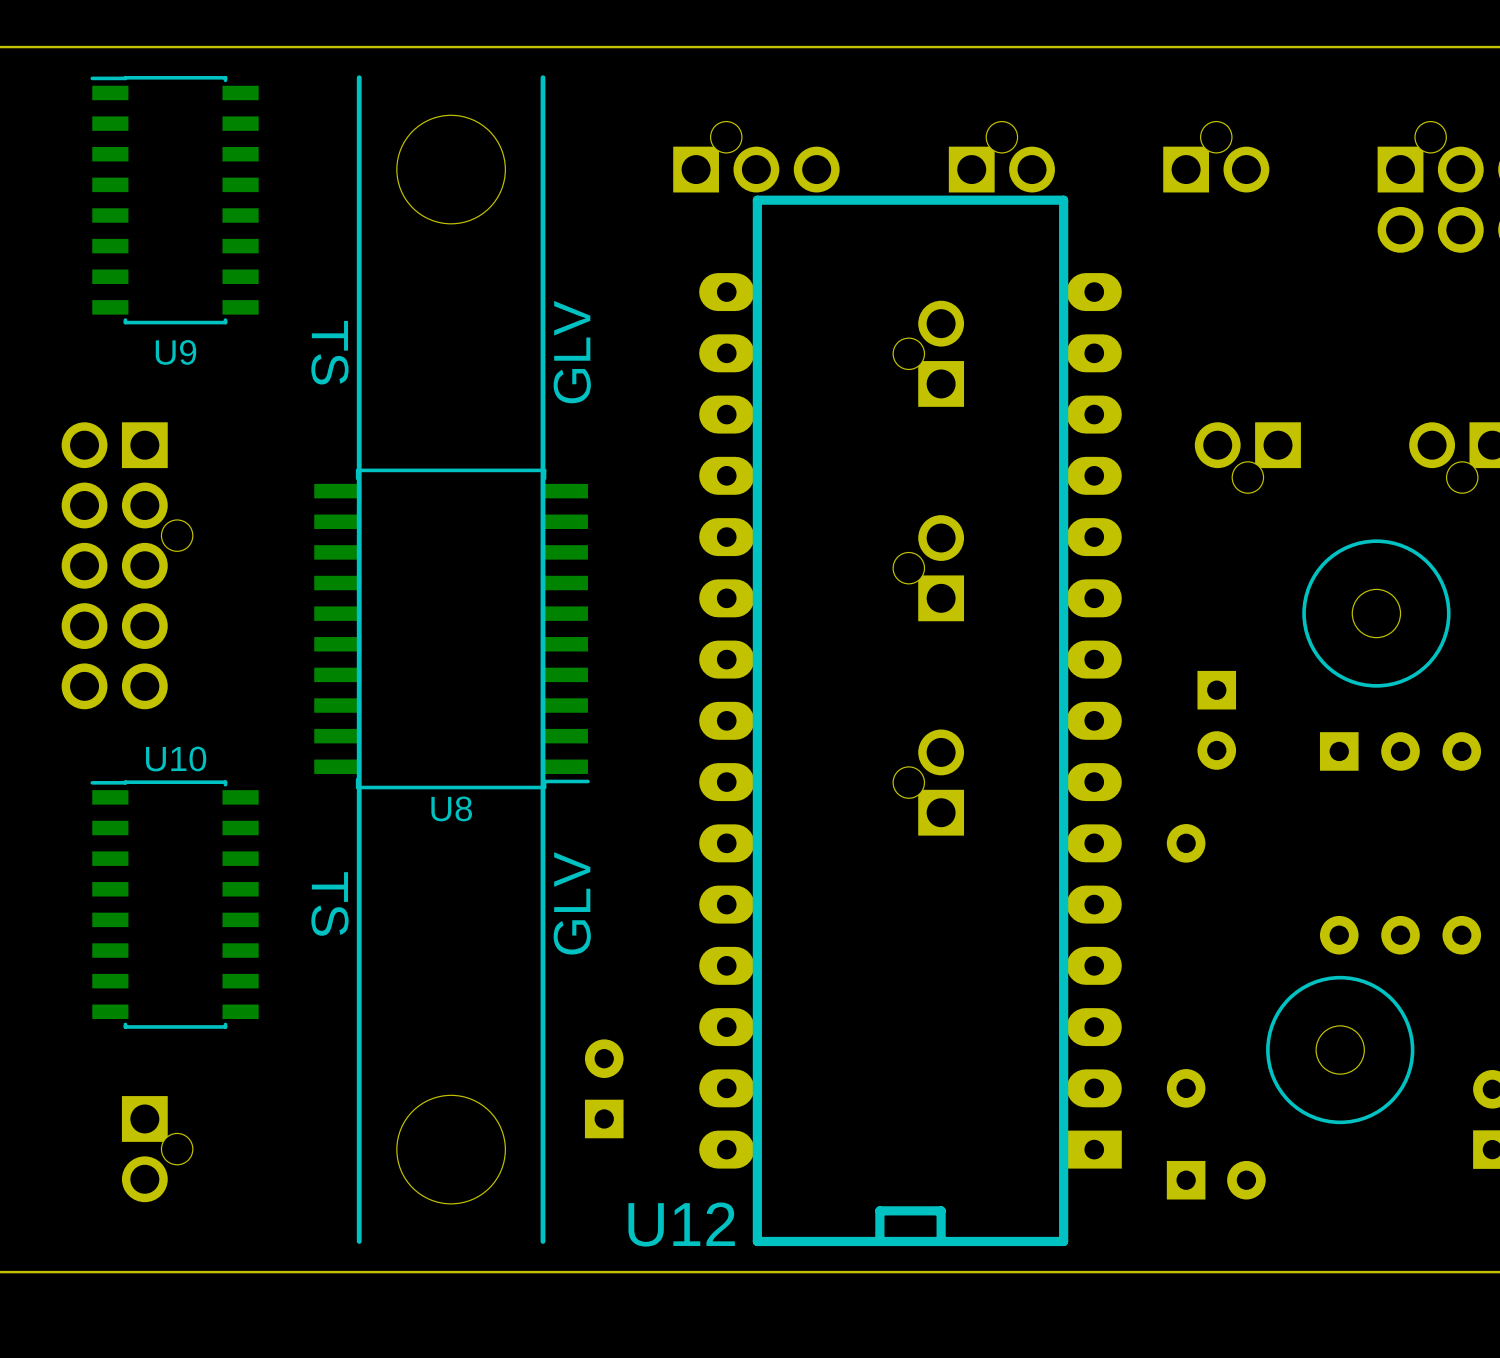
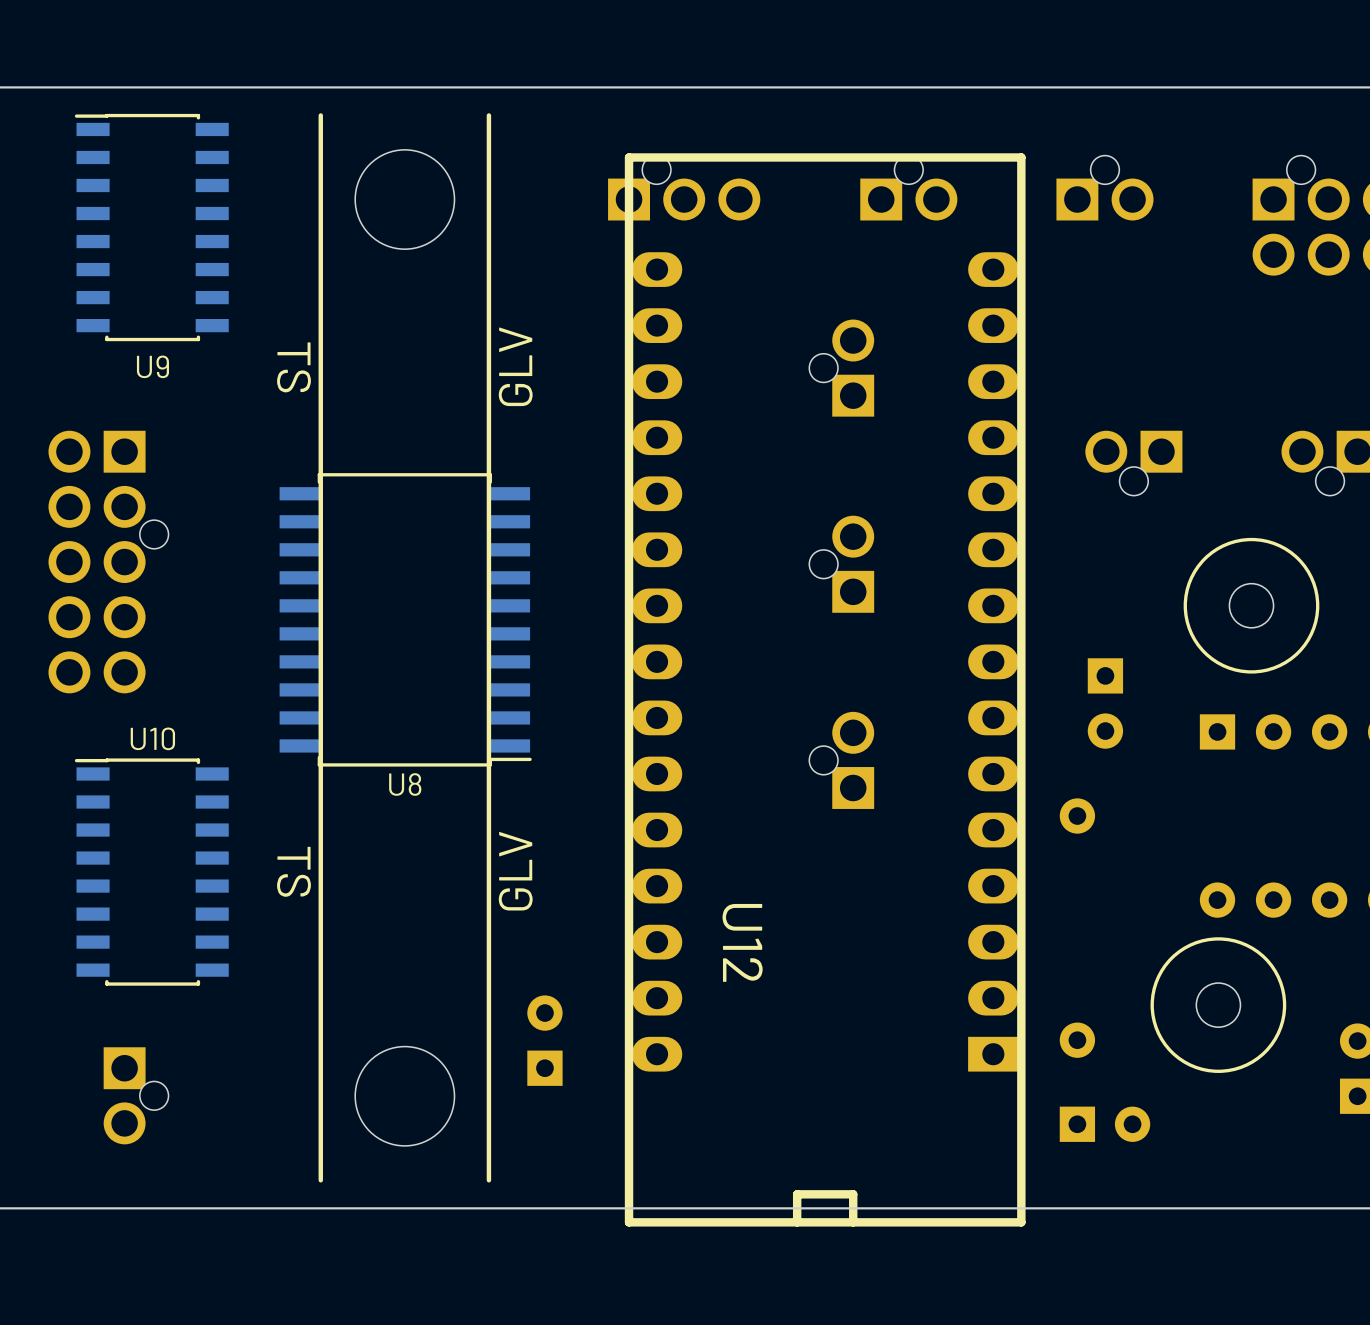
U12 footprint: [699, 195, 1122, 1247] -> [624, 153, 1026, 1227]
U12 name position: U12 (681, 1224) -> U12 (742, 942)

